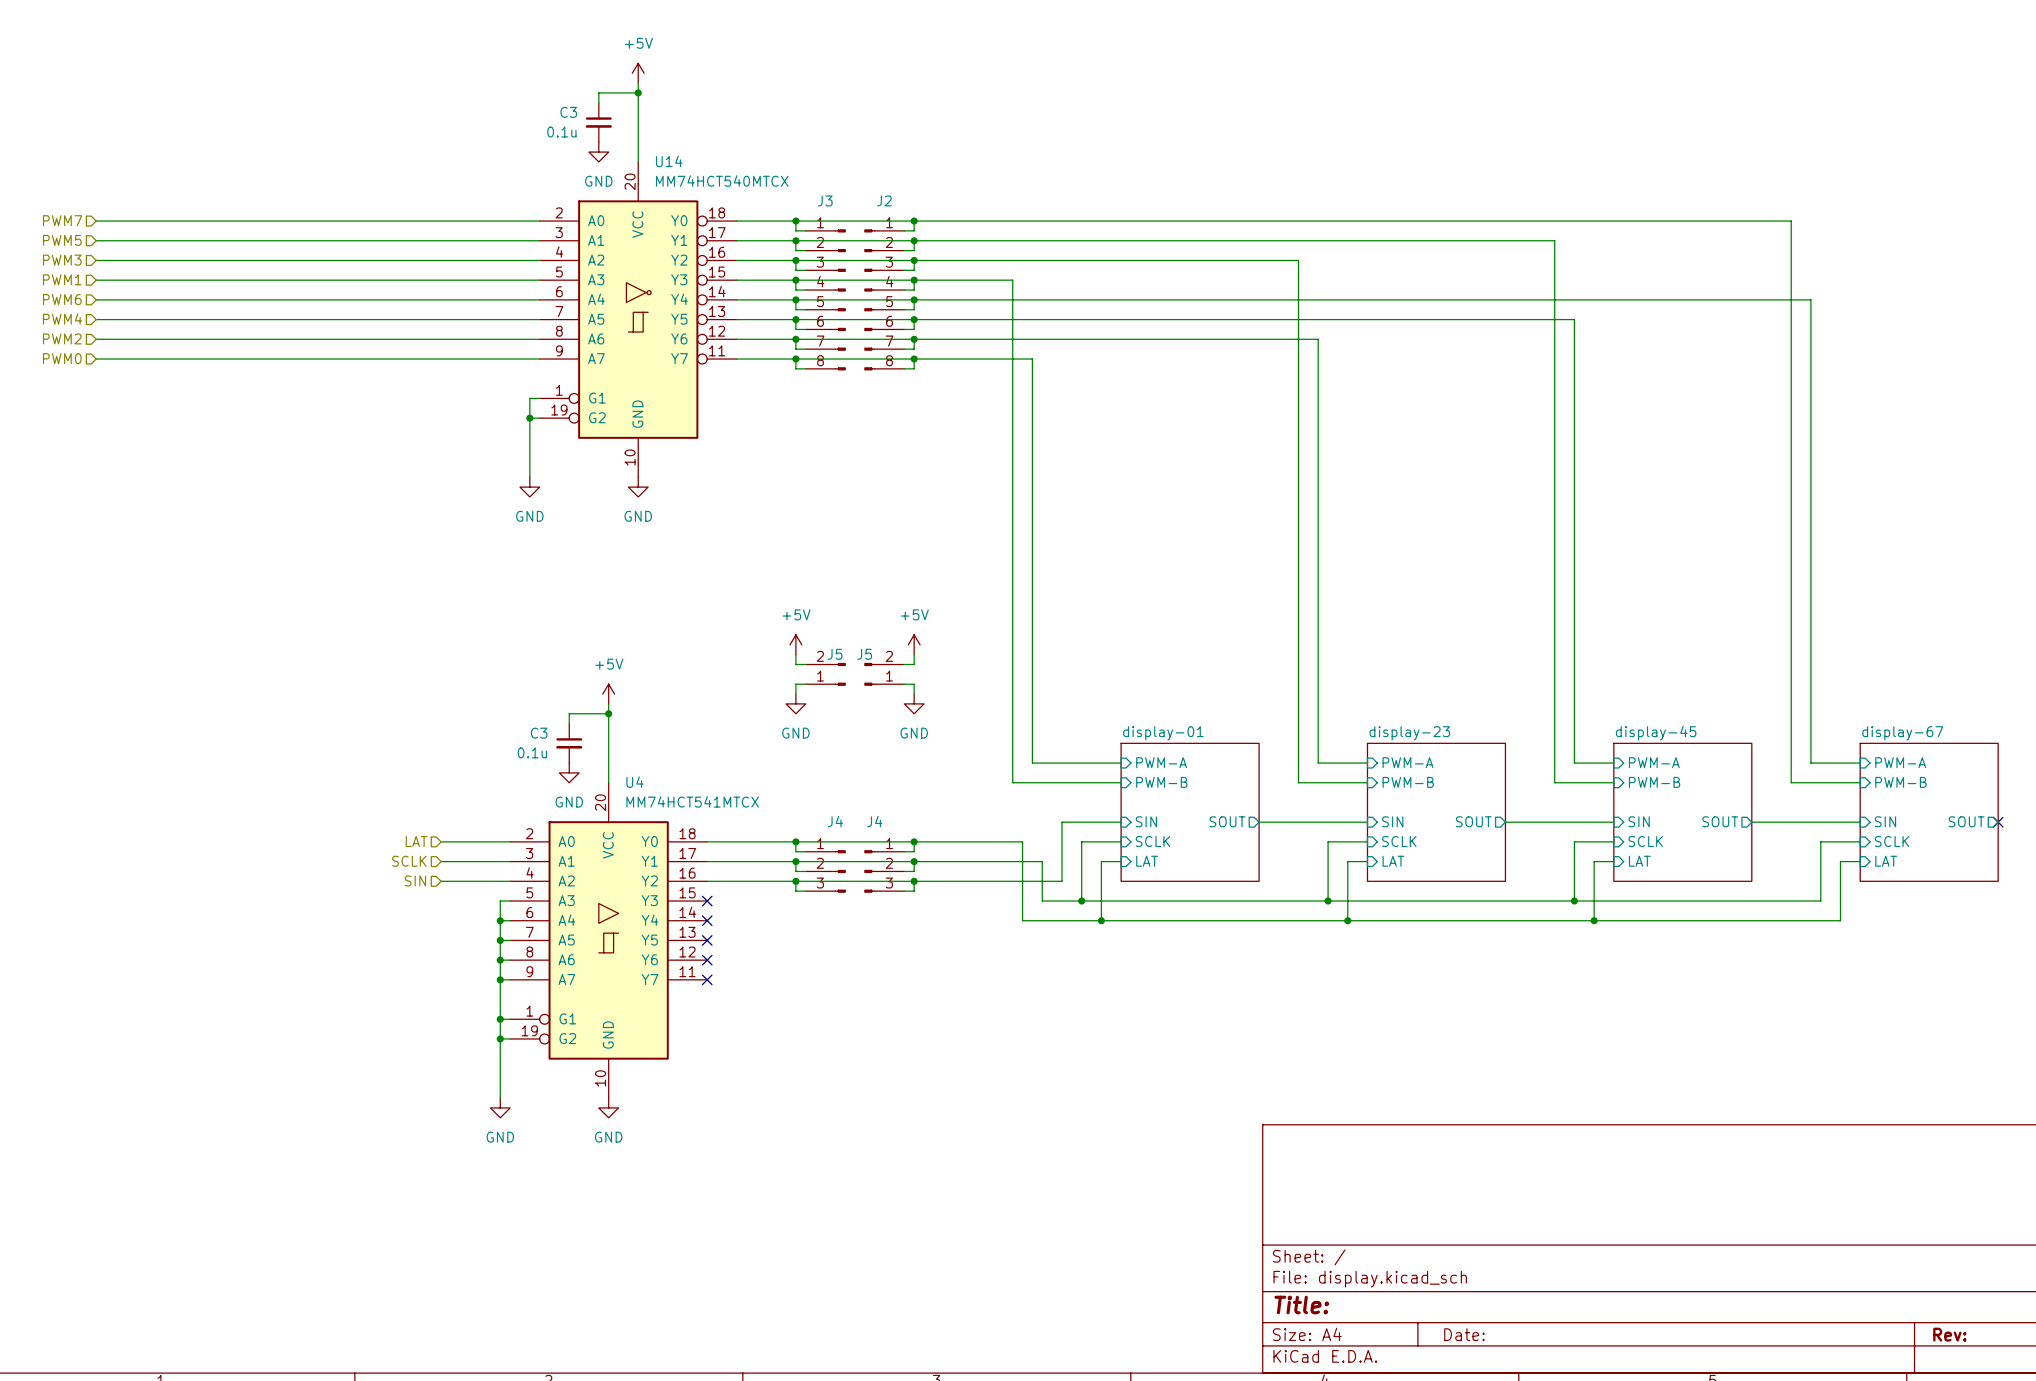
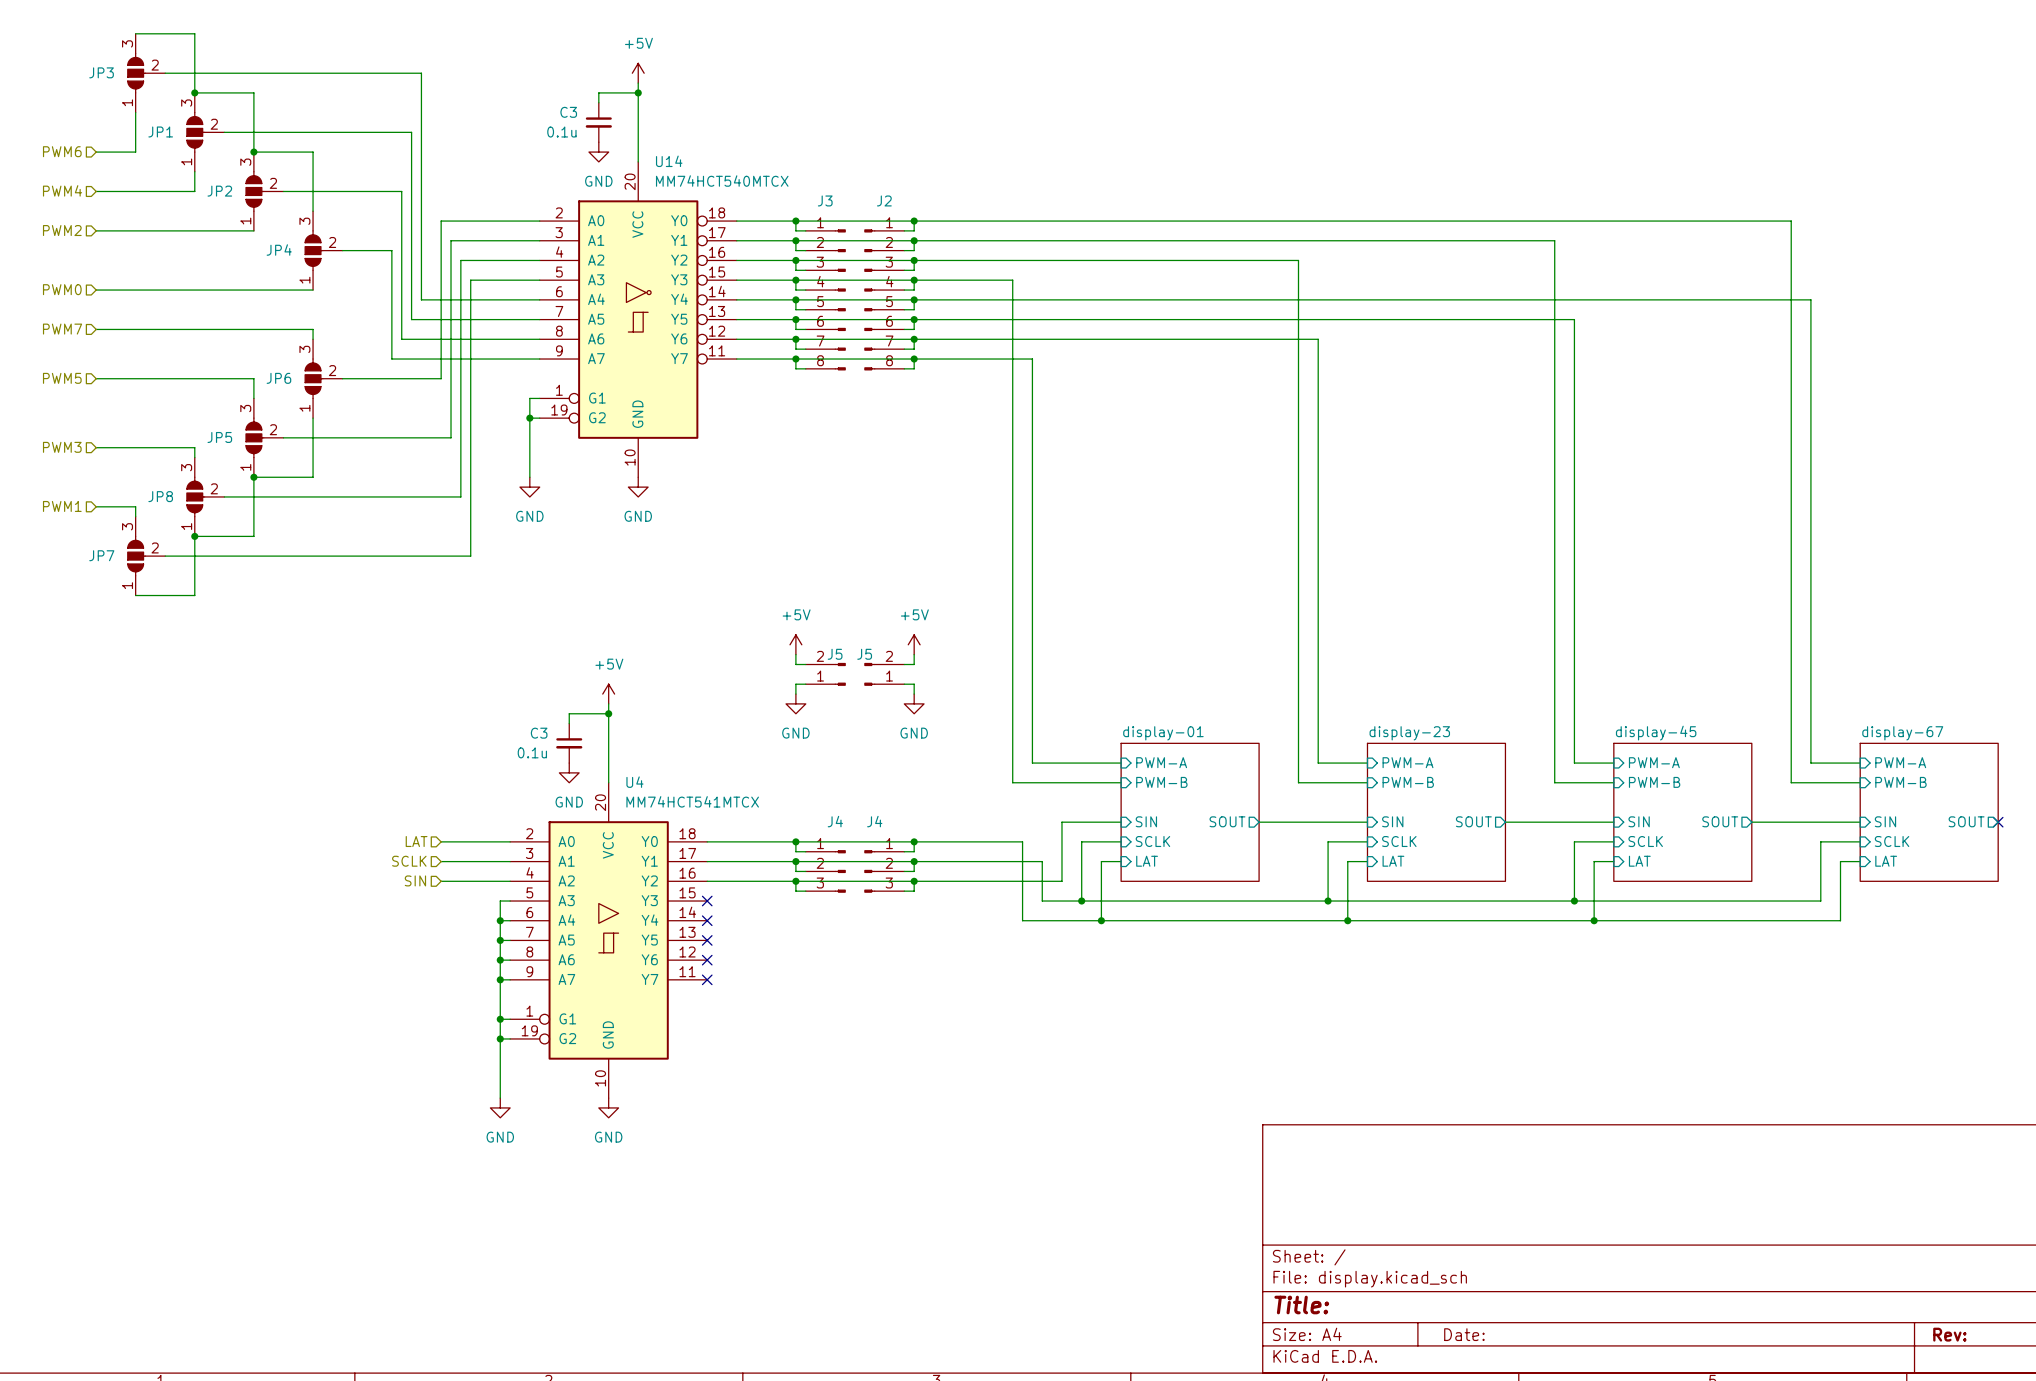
wire: none -> (135, 33) (194, 33) (194, 92) (253, 92) (253, 152) (313, 152) (313, 211)
JP3: none -> (146, 73)
junction: none -> (194, 92)
wire: none -> (135, 112) (135, 152) (96, 152)
JP1: none -> (205, 132)
junction: none -> (253, 152)
wire: none -> (194, 171) (194, 191) (96, 191)
JP2: none -> (264, 191)
hierarchical label position: PWM7 (62, 220) -> PWM7 (62, 329)
wire: (96, 221) (441, 221) -> (342, 378) (441, 378) (441, 221)
wire: none -> (96, 230) (253, 230)
hierarchical label position: PWM5 (62, 240) -> PWM5 (62, 378)
wire: (96, 240) (451, 240) -> (283, 437) (451, 437) (451, 240)
JP4: none -> (323, 250)
hierarchical label position: PWM3 (62, 260) -> PWM3 (62, 447)
wire: (96, 260) (460, 260) -> (224, 496) (460, 496) (460, 260)
hierarchical label: PWM1 (62, 279) -> none
wire: (96, 280) (470, 280) -> (165, 556) (470, 556) (470, 280)
wire: none -> (96, 290) (313, 290)
hierarchical label position: PWM6 (62, 299) -> PWM6 (62, 151)
wire: (96, 299) (421, 299) -> (165, 73) (421, 73) (421, 299)
hierarchical label position: PWM4 (62, 318) -> PWM4 (62, 190)
wire: (96, 319) (411, 319) -> (224, 132) (411, 132) (411, 319)
wire: none -> (96, 329) (313, 329) (313, 339)
hierarchical label position: PWM2 (62, 338) -> PWM2 (62, 230)
wire: (96, 339) (401, 339) -> (283, 191) (401, 191) (401, 339)
hierarchical label position: PWM0 (62, 358) -> PWM0 (62, 289)
wire: (96, 359) (391, 359) -> (342, 250) (391, 250) (391, 359)
wire: none -> (96, 378) (253, 378) (253, 398)
JP6: none -> (323, 378)
wire: none -> (313, 418) (313, 477) (253, 477) (253, 536) (194, 536) (194, 595) (135, 595)
JP5: none -> (264, 437)
wire: none -> (96, 447) (194, 447) (194, 457)
junction: none -> (253, 477)
JP8: none -> (205, 496)
hierarchical label: none -> PWM1 (62, 506)
wire: none -> (96, 506) (135, 506) (135, 516)
junction: none -> (194, 536)
JP7: none -> (146, 556)

